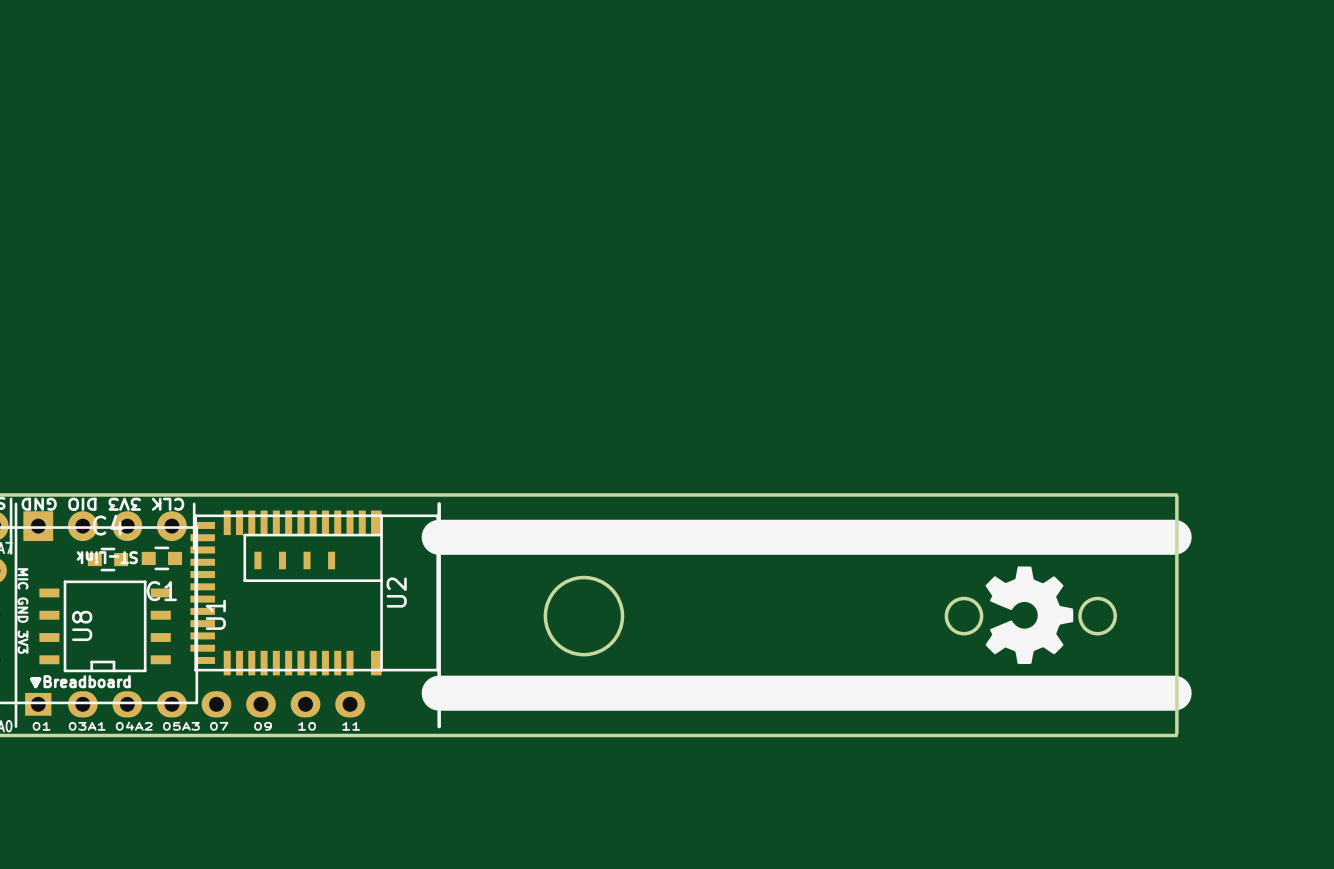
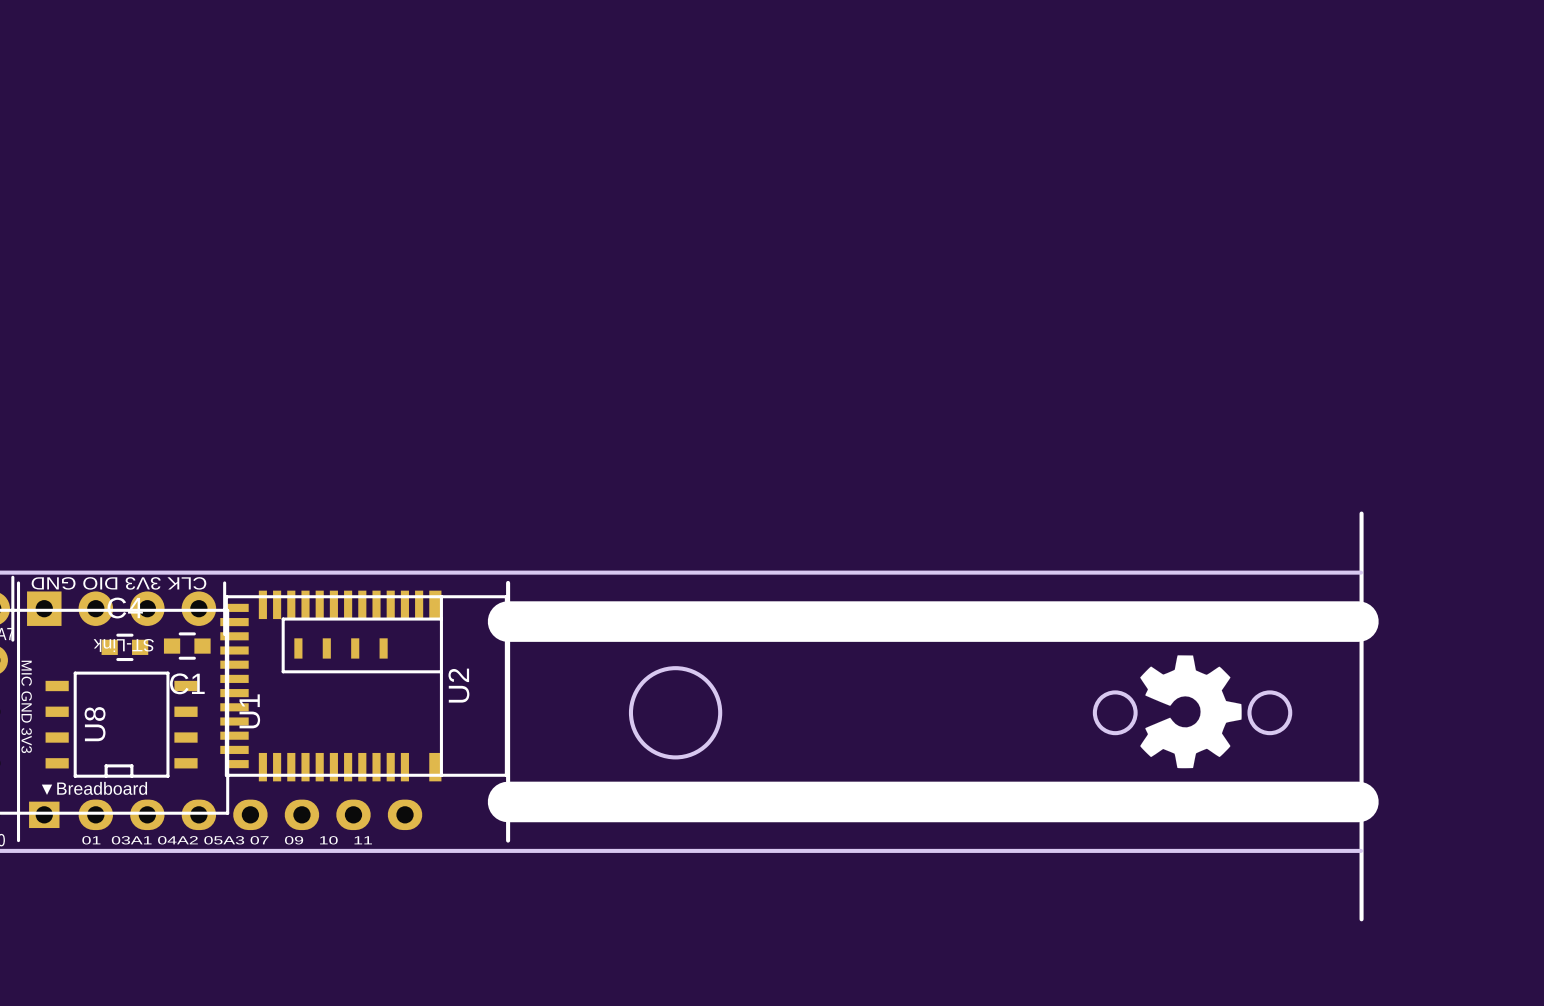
line: none -> (1361, 513) (1361, 919)
board edge: (1176, 496) (1176, 733) -> none

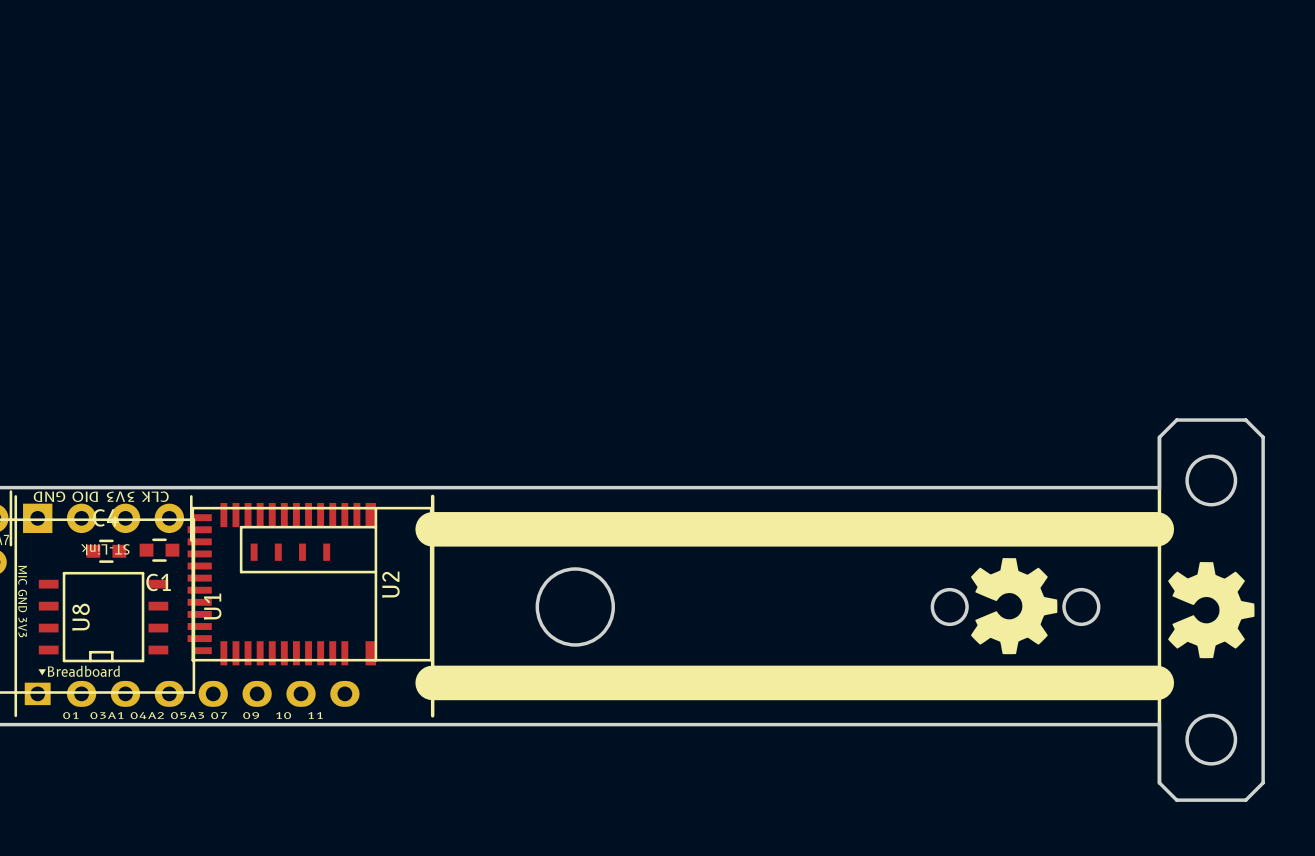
round board edge: none -> [1185, 454, 1238, 507]
board edge: none -> (1159, 489) (1159, 437) (1176, 420) (1245, 420) (1263, 437) (1263, 782) (1245, 800) (1176, 800) (1159, 782) (1159, 722)
drawing: none -> [1168, 562, 1255, 659]
round board edge: none -> [1185, 713, 1238, 766]

